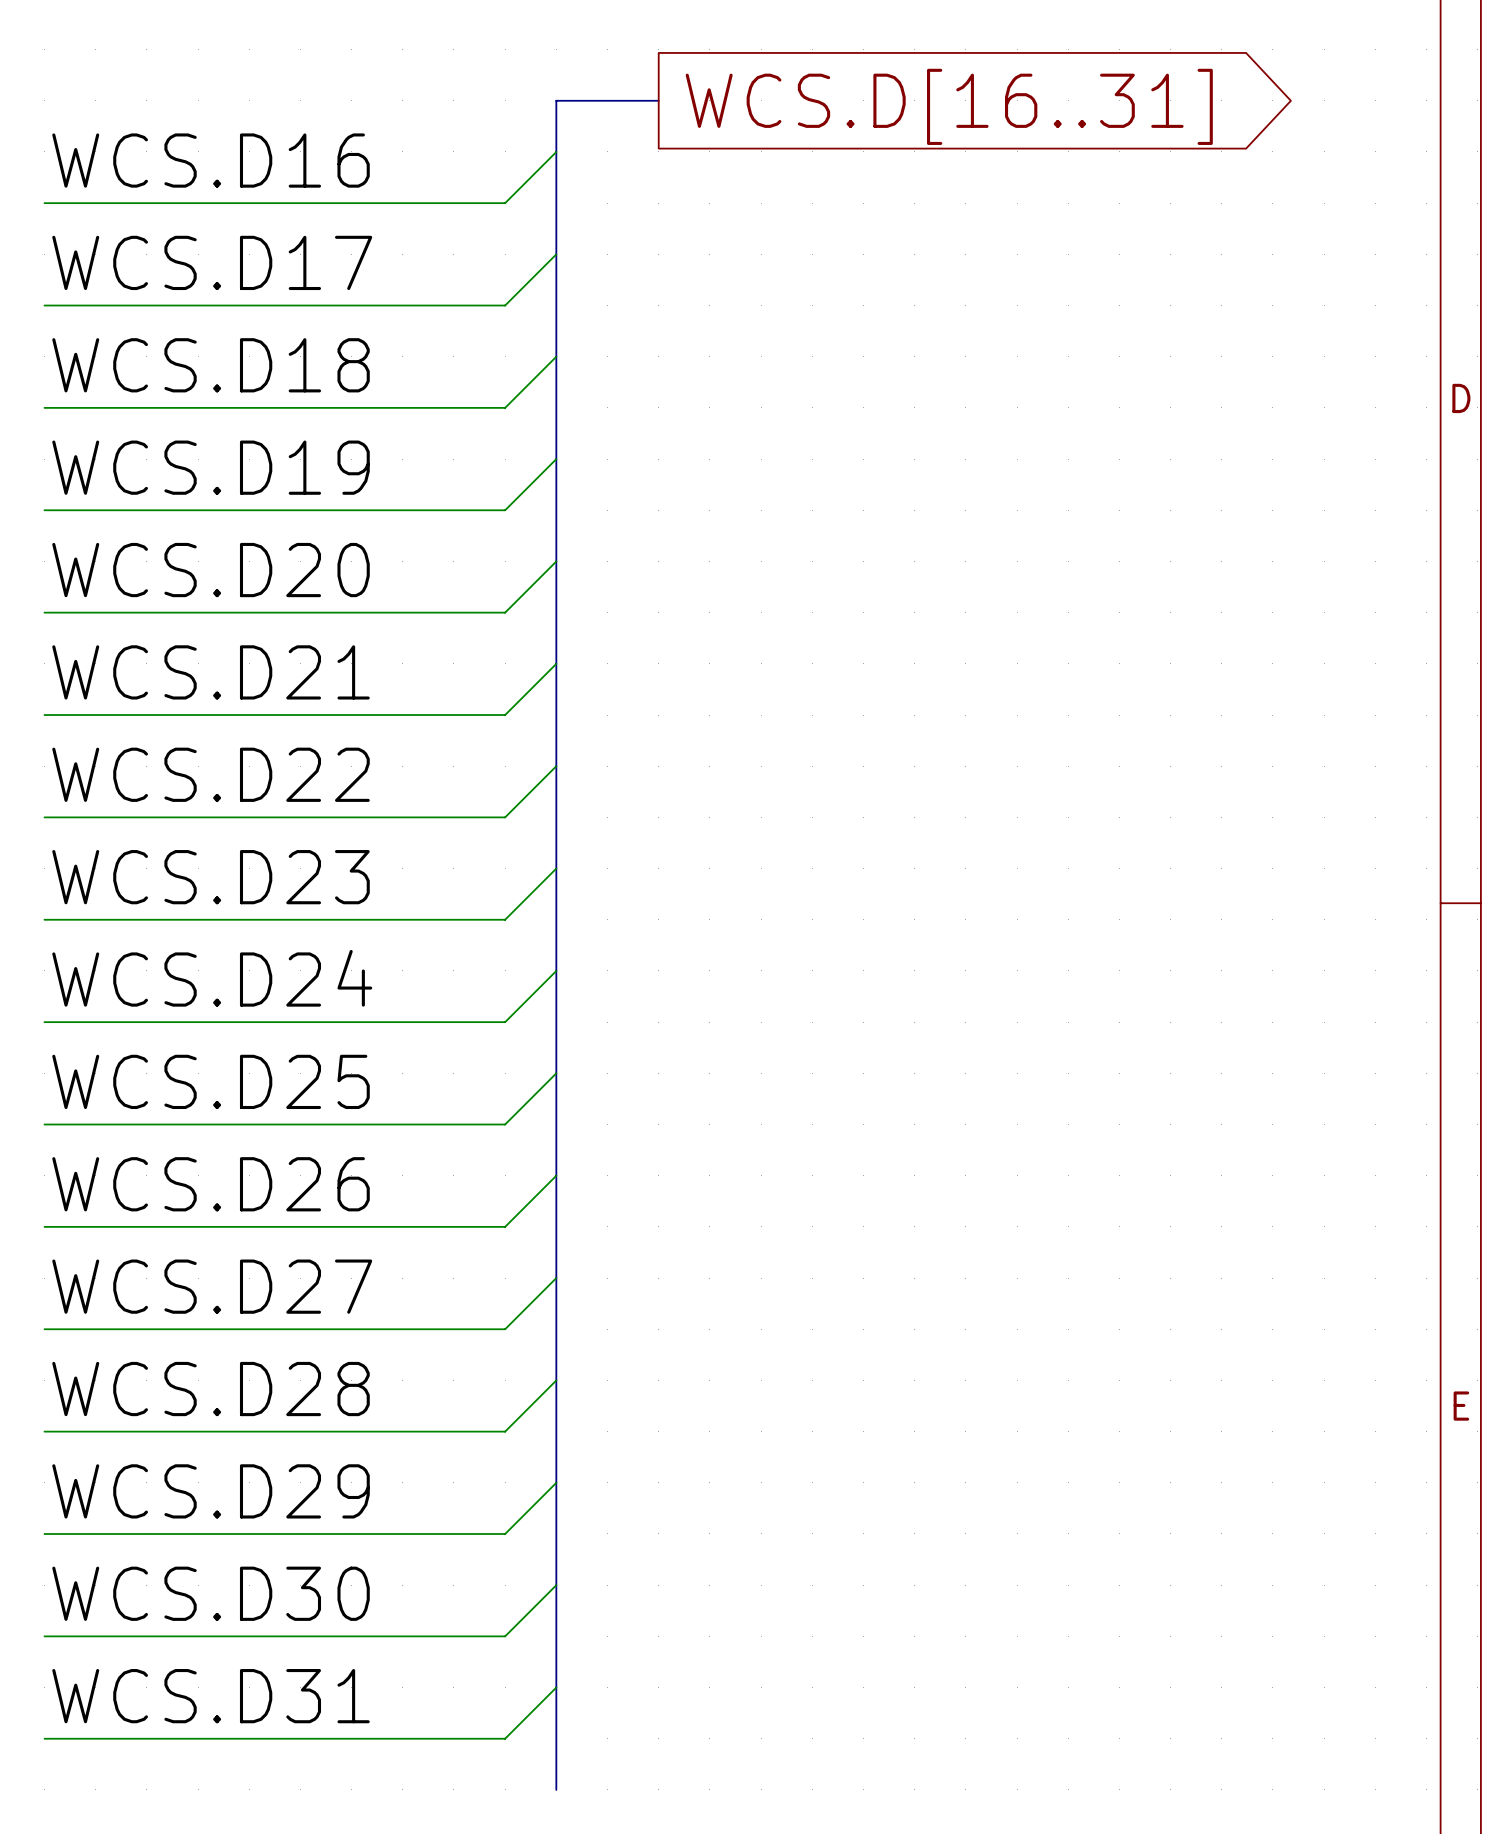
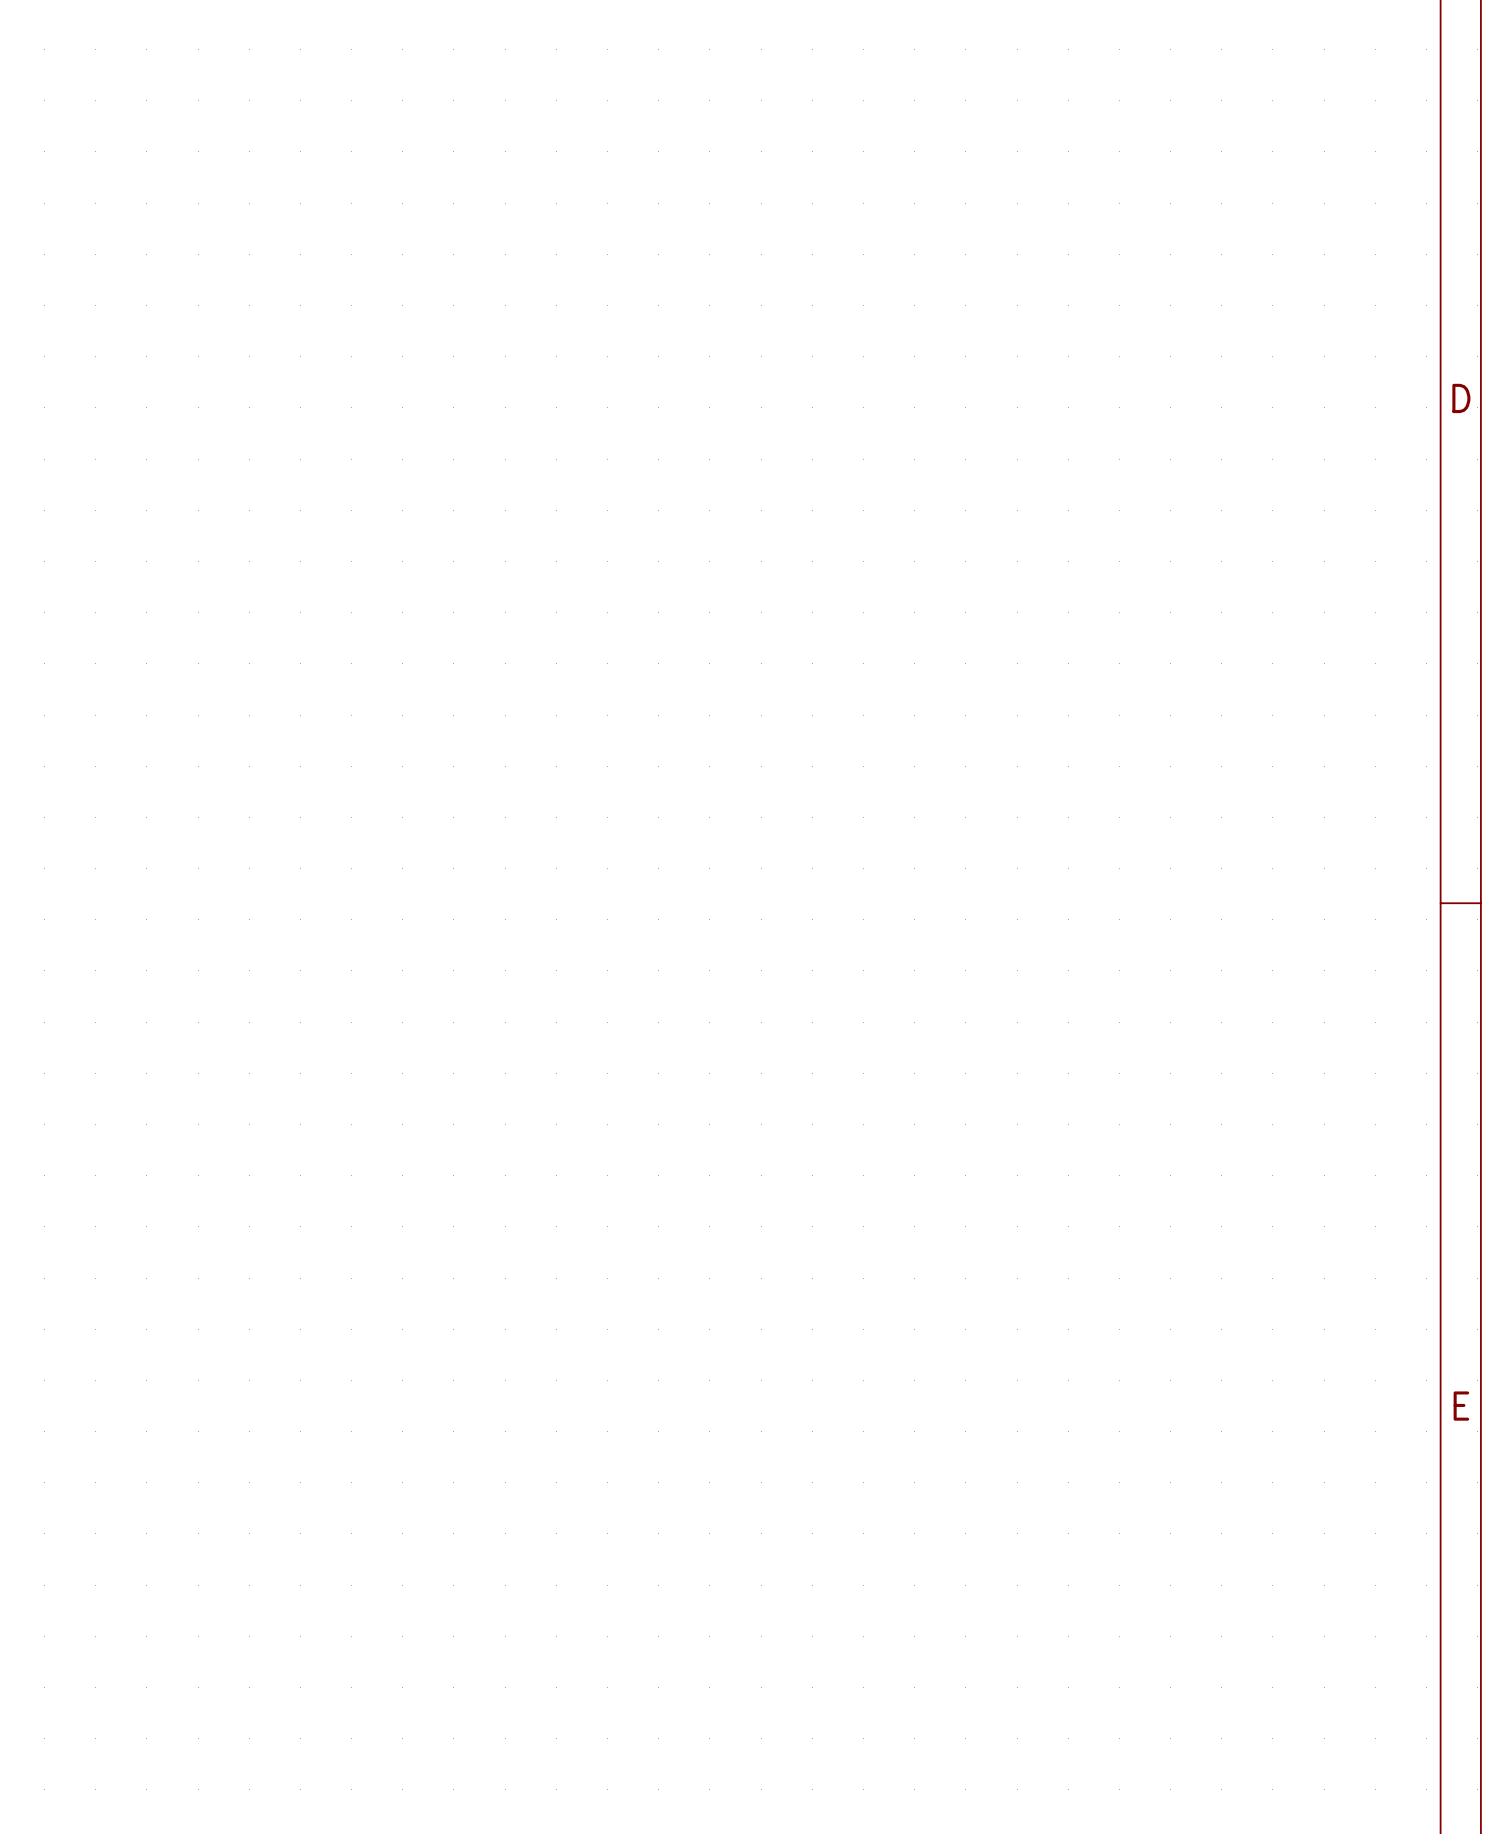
bus: (658, 100) (556, 100) (556, 1789) -> none
global label: WCS.D[16..31] (949, 106) -> none
wire: (556, 151) (505, 203) (44, 203) -> none
label: WCS.D16 (211, 160) -> none
wire: (556, 254) (505, 305) (44, 305) -> none
label: WCS.D17 (212, 262) -> none
wire: (556, 356) (505, 407) (44, 407) -> none
label: WCS.D18 (211, 365) -> none
wire: (556, 459) (505, 510) (44, 510) -> none
label: WCS.D19 (211, 467) -> none
wire: (556, 561) (505, 612) (44, 612) -> none
label: WCS.D20 (211, 570) -> none
wire: (556, 663) (505, 715) (44, 715) -> none
label: WCS.D21 (211, 672) -> none
wire: (556, 766) (505, 817) (44, 817) -> none
label: WCS.D22 (211, 774) -> none
wire: (556, 868) (505, 919) (44, 919) -> none
label: WCS.D23 (211, 877) -> none
wire: (556, 970) (505, 1022) (44, 1022) -> none
label: WCS.D24 (212, 978) -> none
wire: (556, 1073) (505, 1124) (44, 1124) -> none
label: WCS.D25 (211, 1081) -> none
wire: (556, 1175) (505, 1226) (44, 1226) -> none
label: WCS.D26 (211, 1184) -> none
wire: (556, 1278) (505, 1329) (44, 1329) -> none
label: WCS.D27 (212, 1286) -> none
wire: (556, 1380) (505, 1431) (44, 1431) -> none
label: WCS.D28 (211, 1389) -> none
wire: (556, 1482) (505, 1533) (44, 1533) -> none
label: WCS.D29 (211, 1491) -> none
wire: (556, 1585) (505, 1636) (44, 1636) -> none
label: WCS.D30 (211, 1593) -> none
wire: (556, 1687) (505, 1738) (44, 1738) -> none
label: WCS.D31 (211, 1696) -> none

